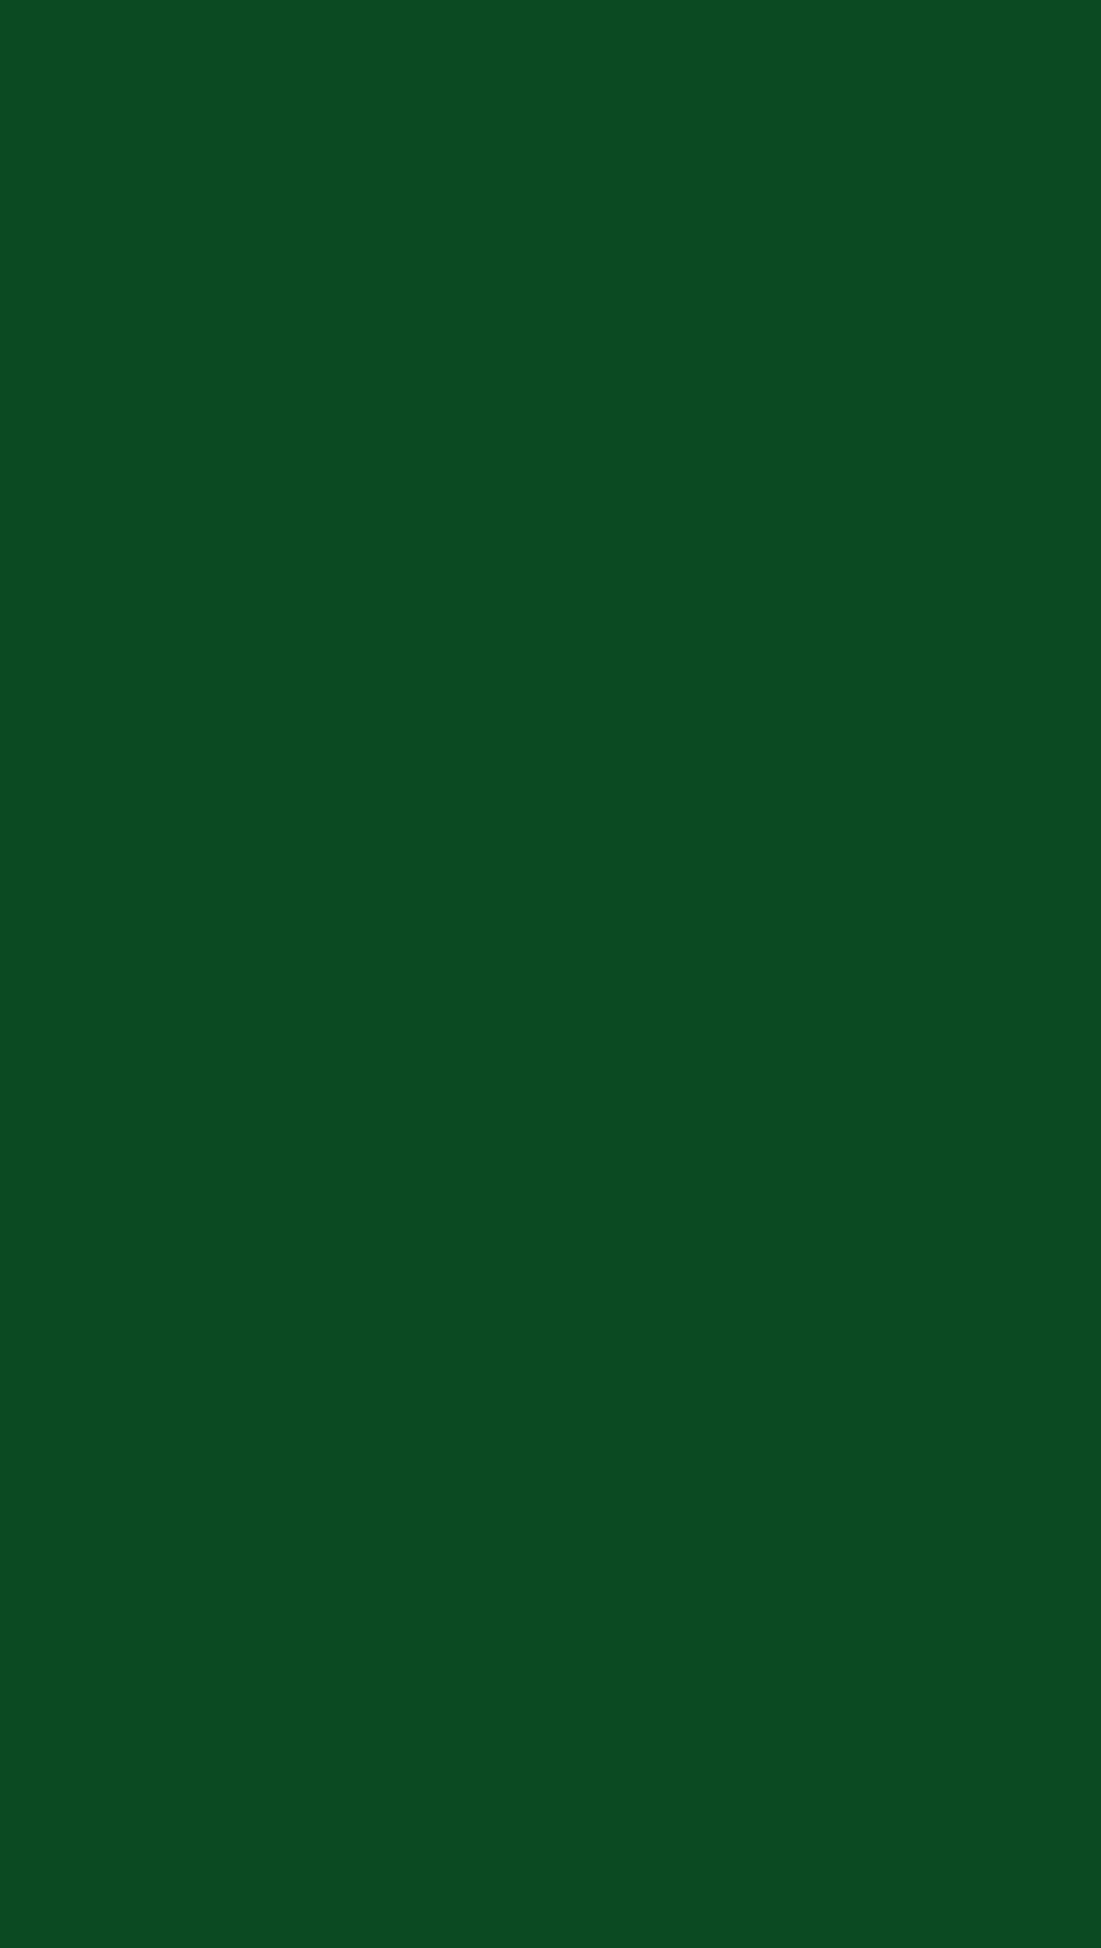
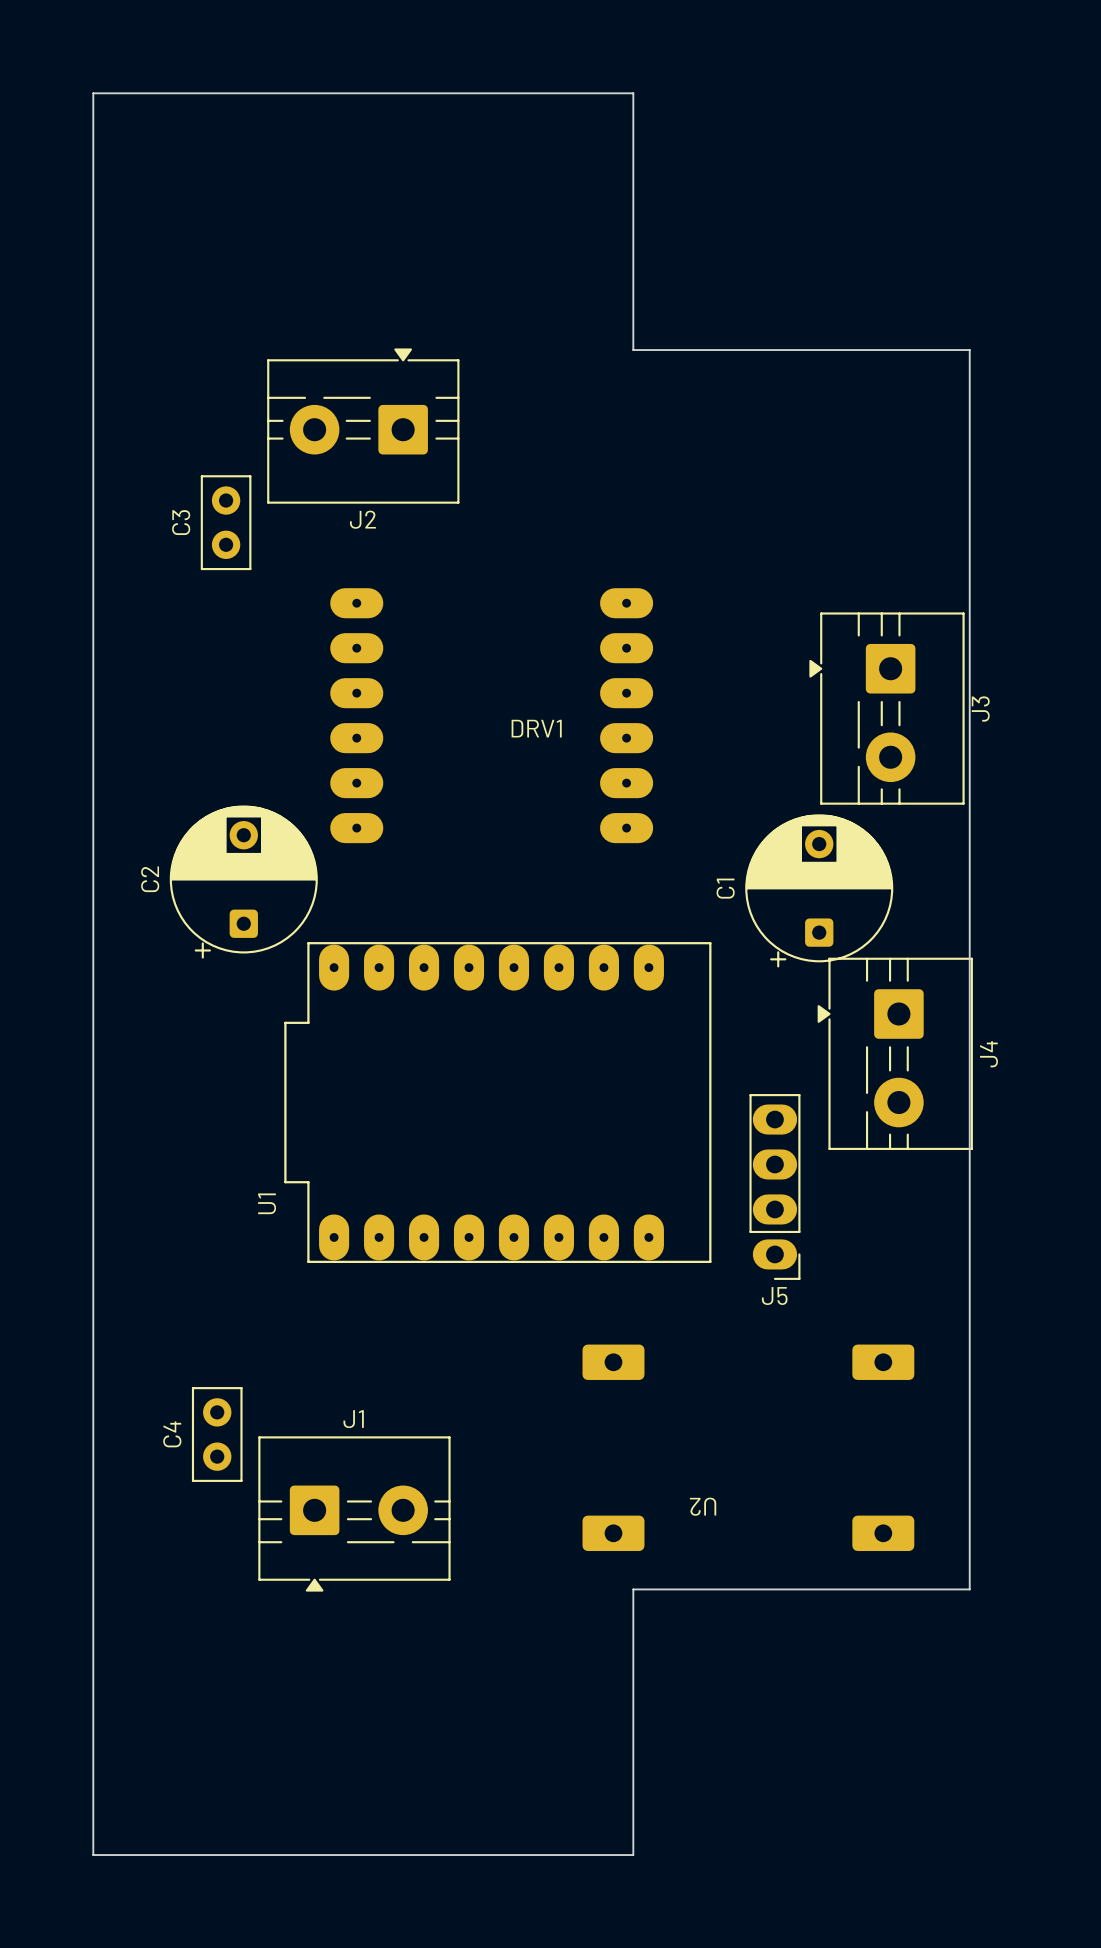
board edge: none -> (93, 93) (93, 1855) (633, 1855) (633, 1589) (969, 1589) (969, 350) (633, 350) (633, 93) (93, 93)
J2: none -> (363, 426)
C3: none -> (226, 522)
J3: none -> (887, 708)
DRV1: none -> (491, 715)
C2: none -> (243, 882)
C1: none -> (819, 890)
J4: none -> (895, 1053)
U1: none -> (497, 1102)
J5: none -> (774, 1186)
C4: none -> (217, 1434)
U2: none -> (748, 1447)
J1: none -> (354, 1513)

